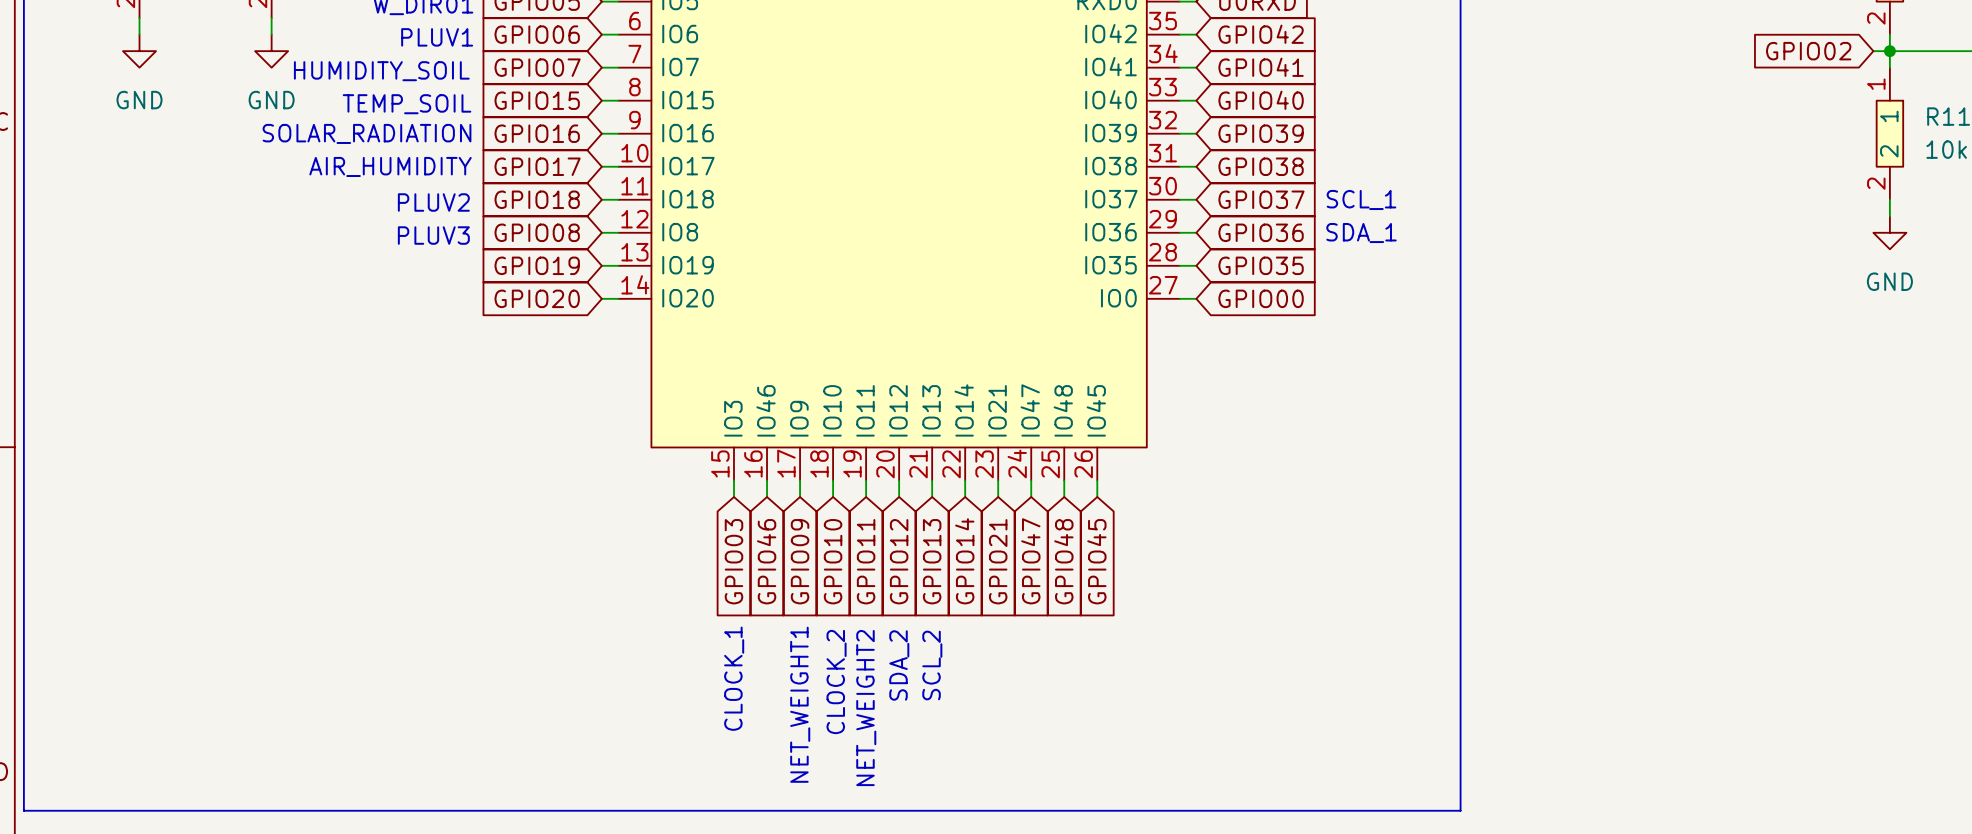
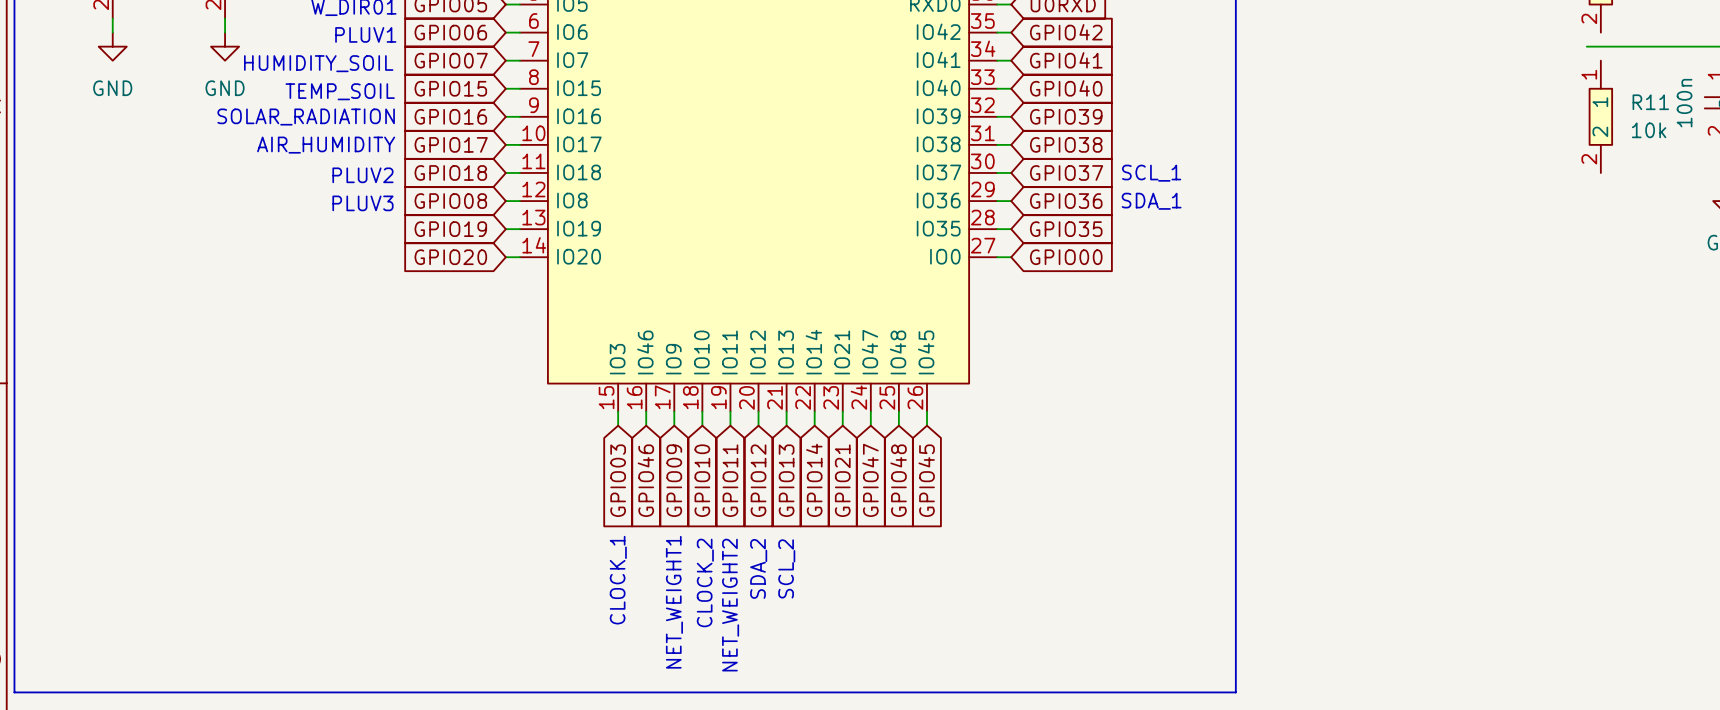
wire: (1889, 34) (1889, 67) -> none
global label: GPIO02 (1808, 51) -> none
junction: (1889, 51) -> none
wire: (1889, 199) (1889, 216) -> none
power symbol: GND (1889, 232) -> none

